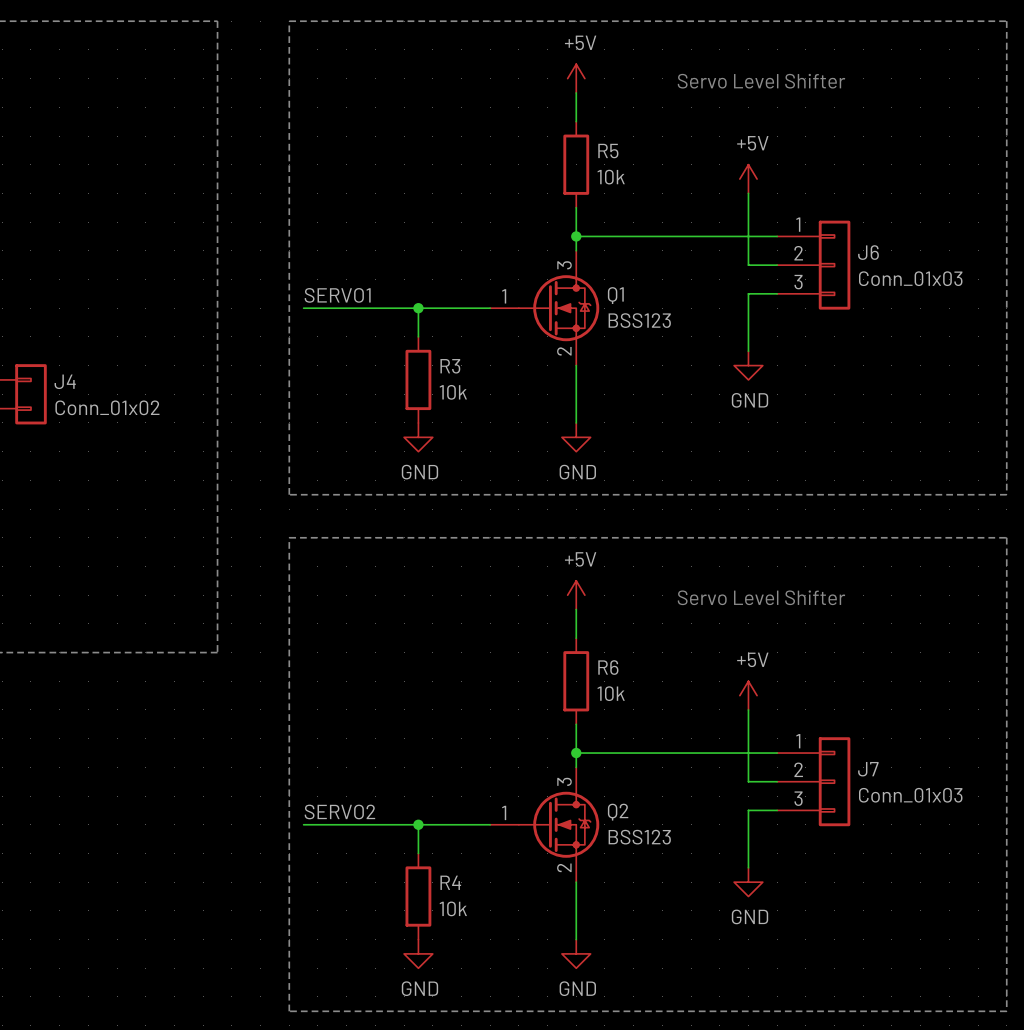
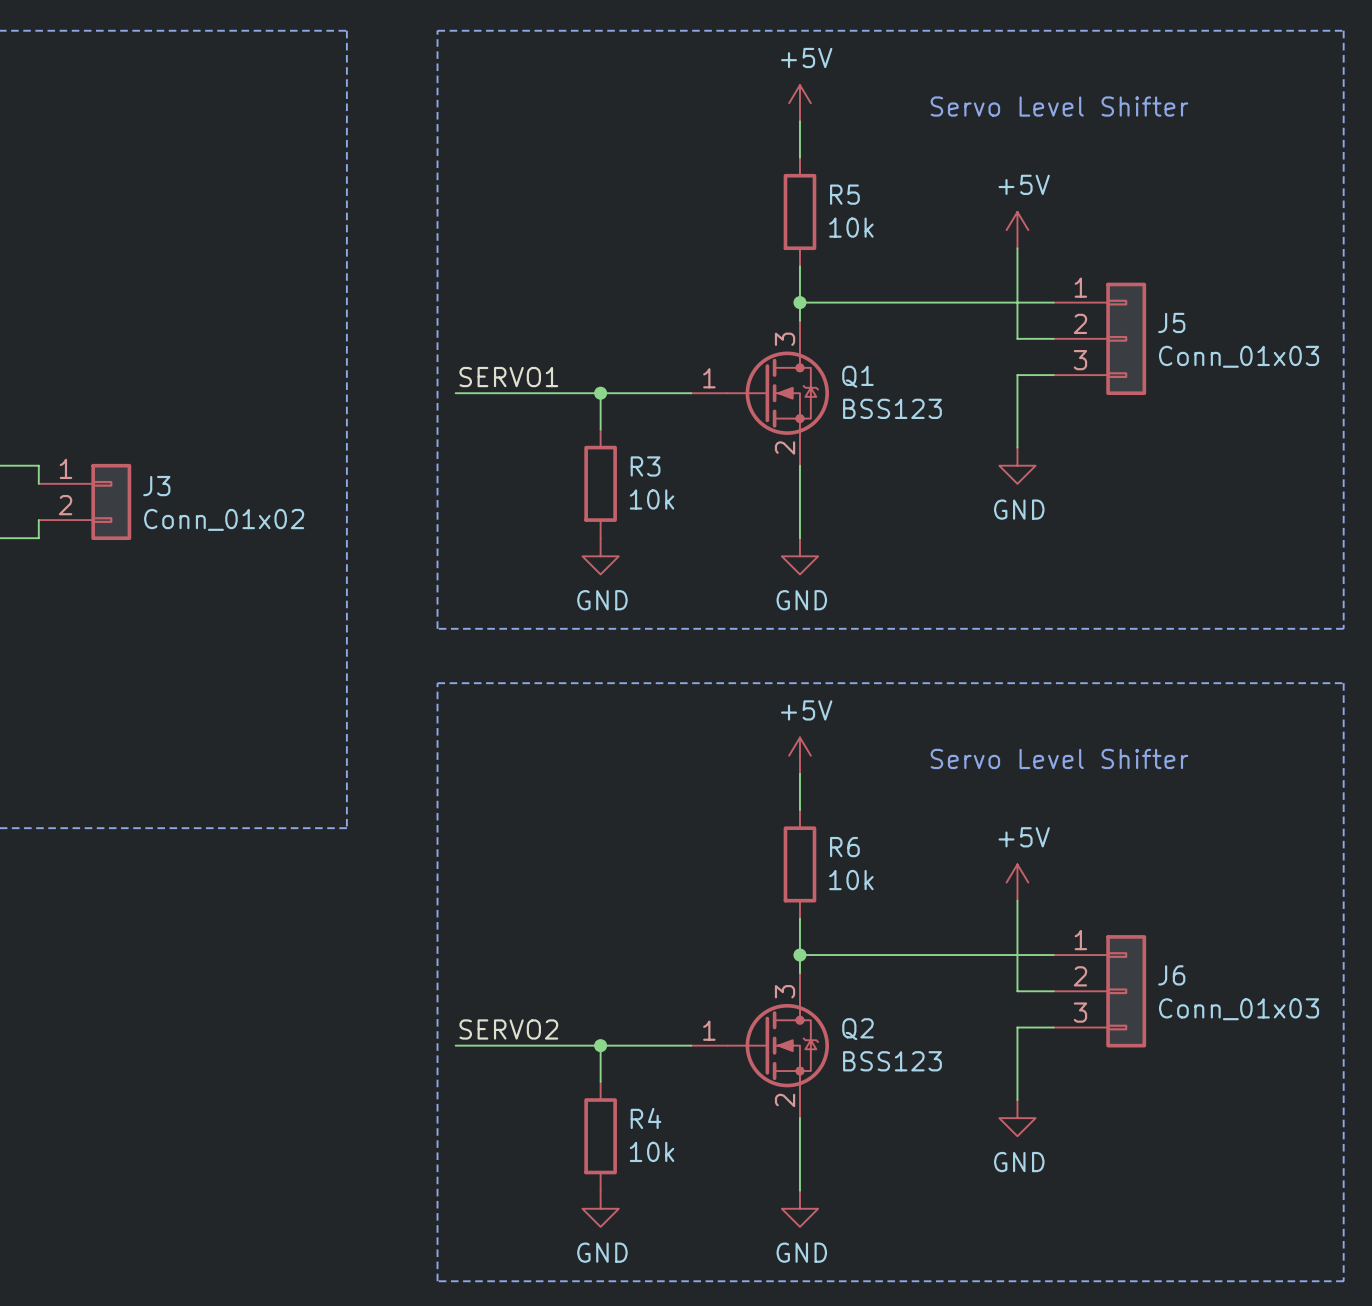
J6 name: J6 (868, 252) -> J5 (1171, 322)
J4 name: J4 (65, 381) -> J3 (156, 486)
J7 name: J7 (868, 769) -> J6 (1171, 975)

